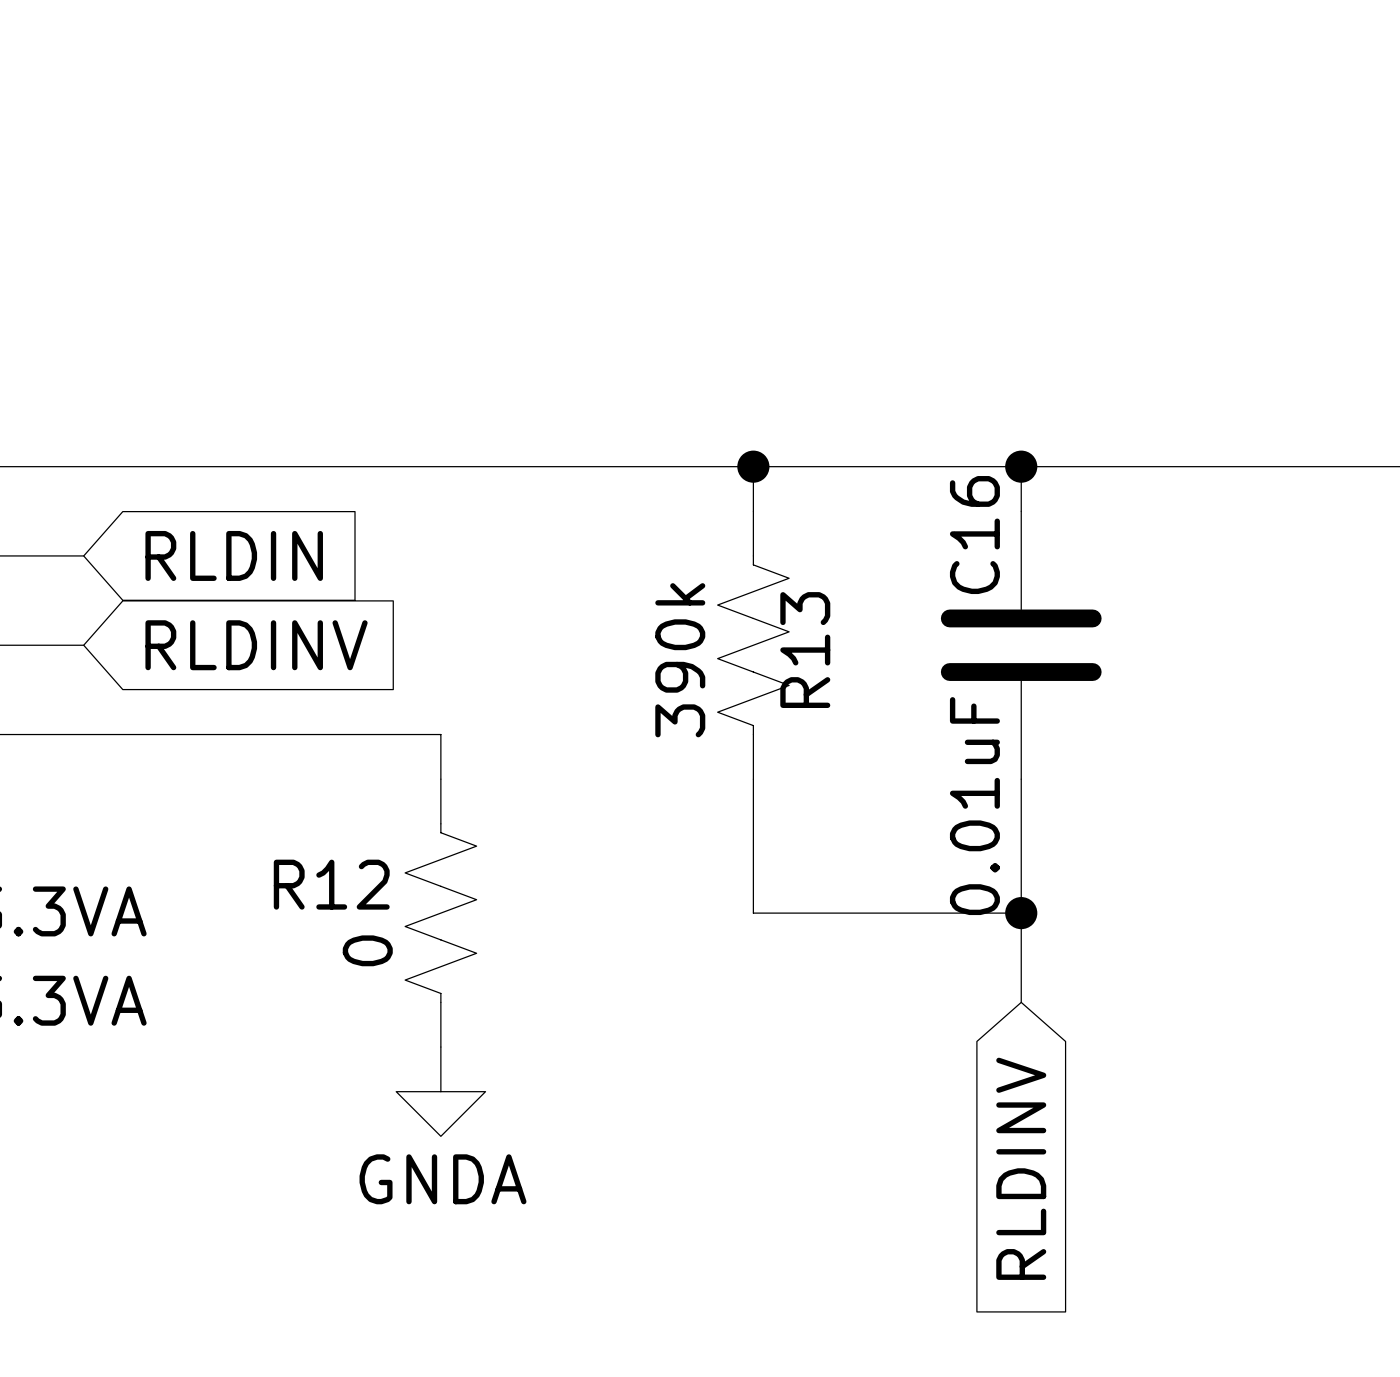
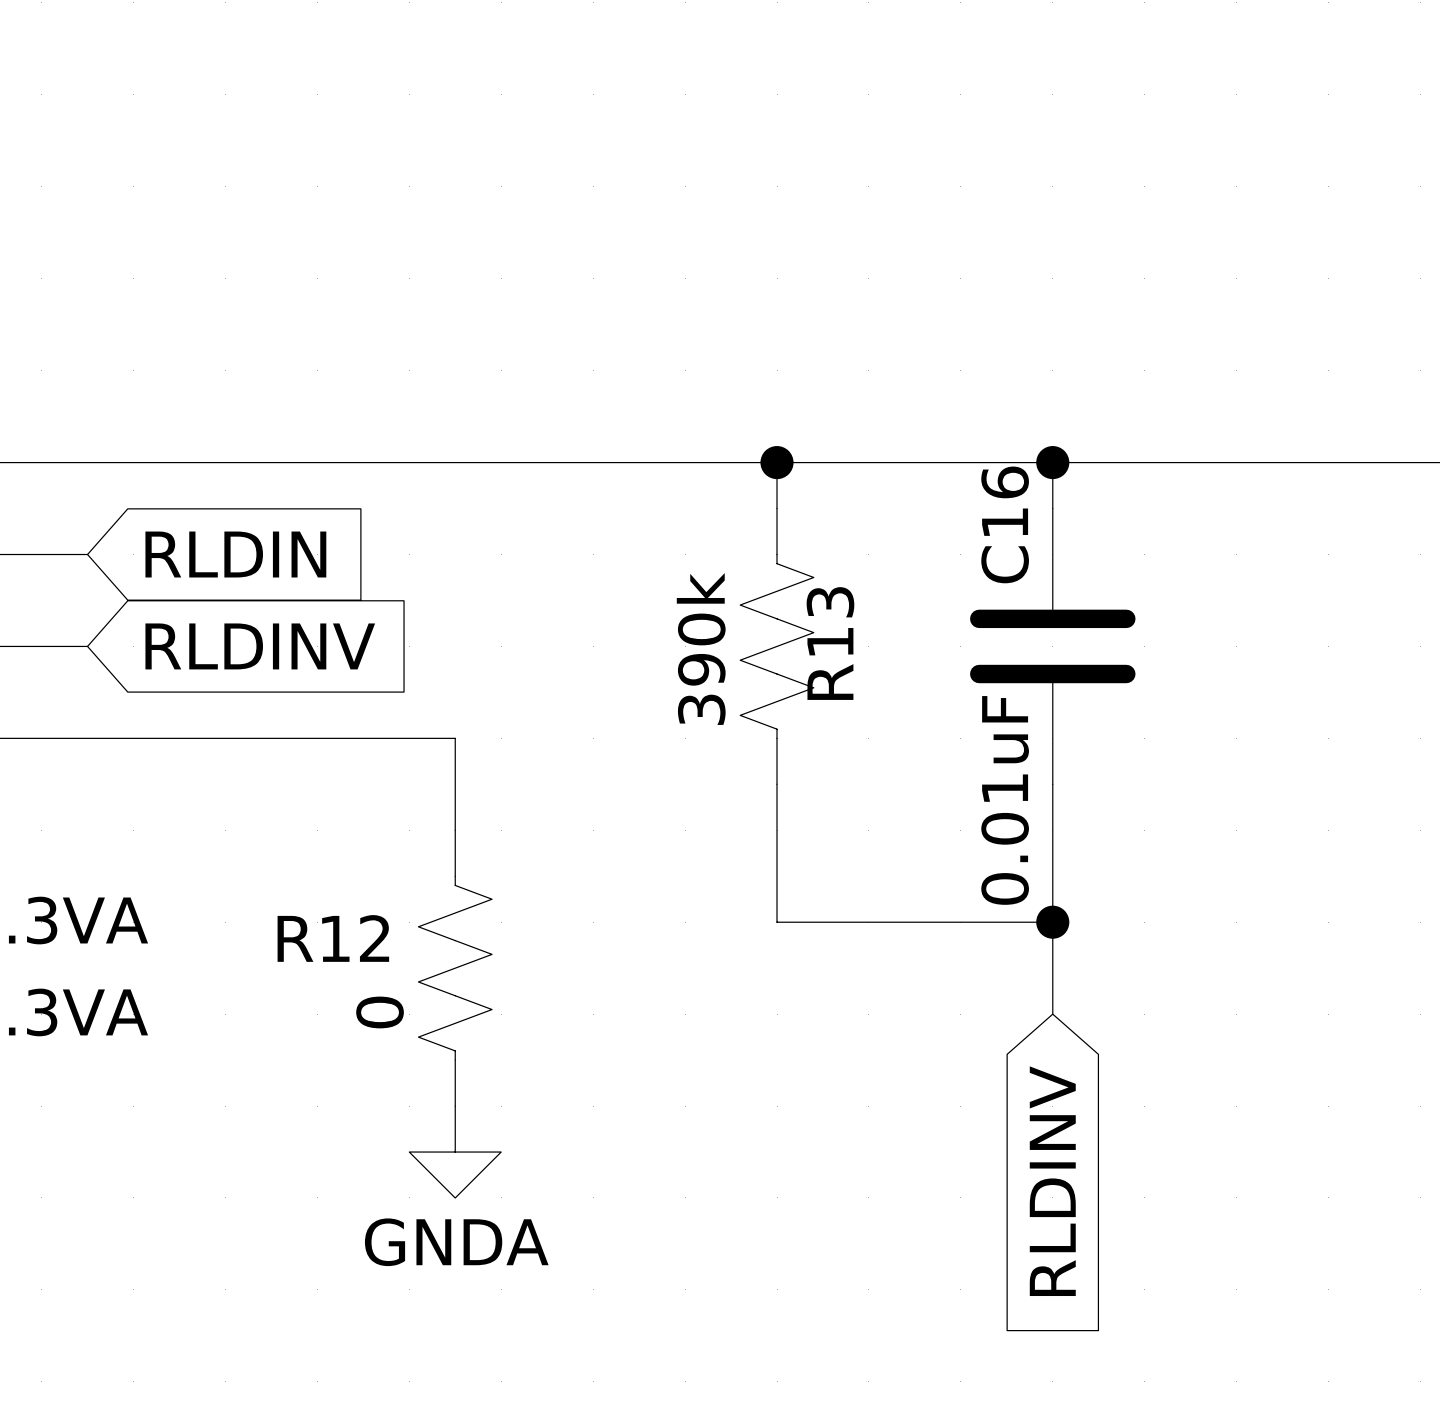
R12 position: (440, 913) -> (455, 968)
power symbol position: GNDA (440, 1091) -> GNDA (455, 1152)

